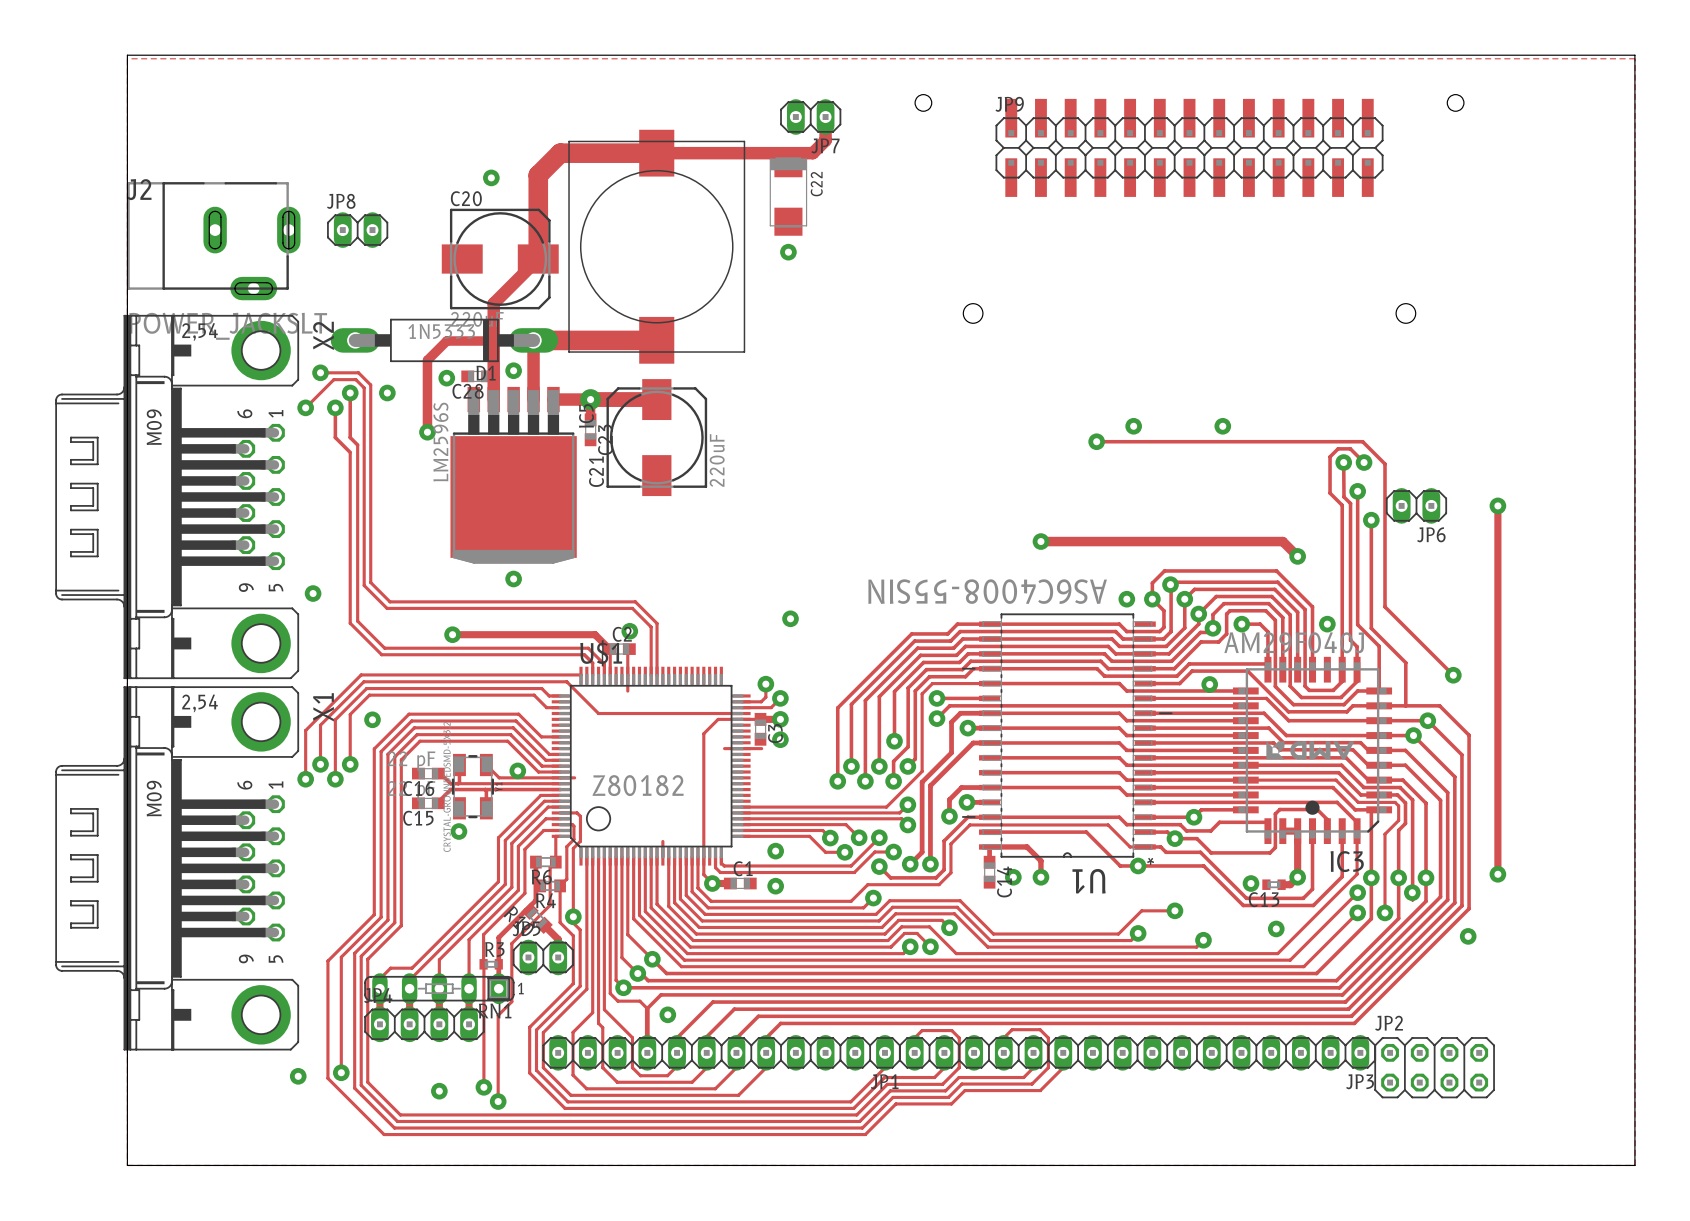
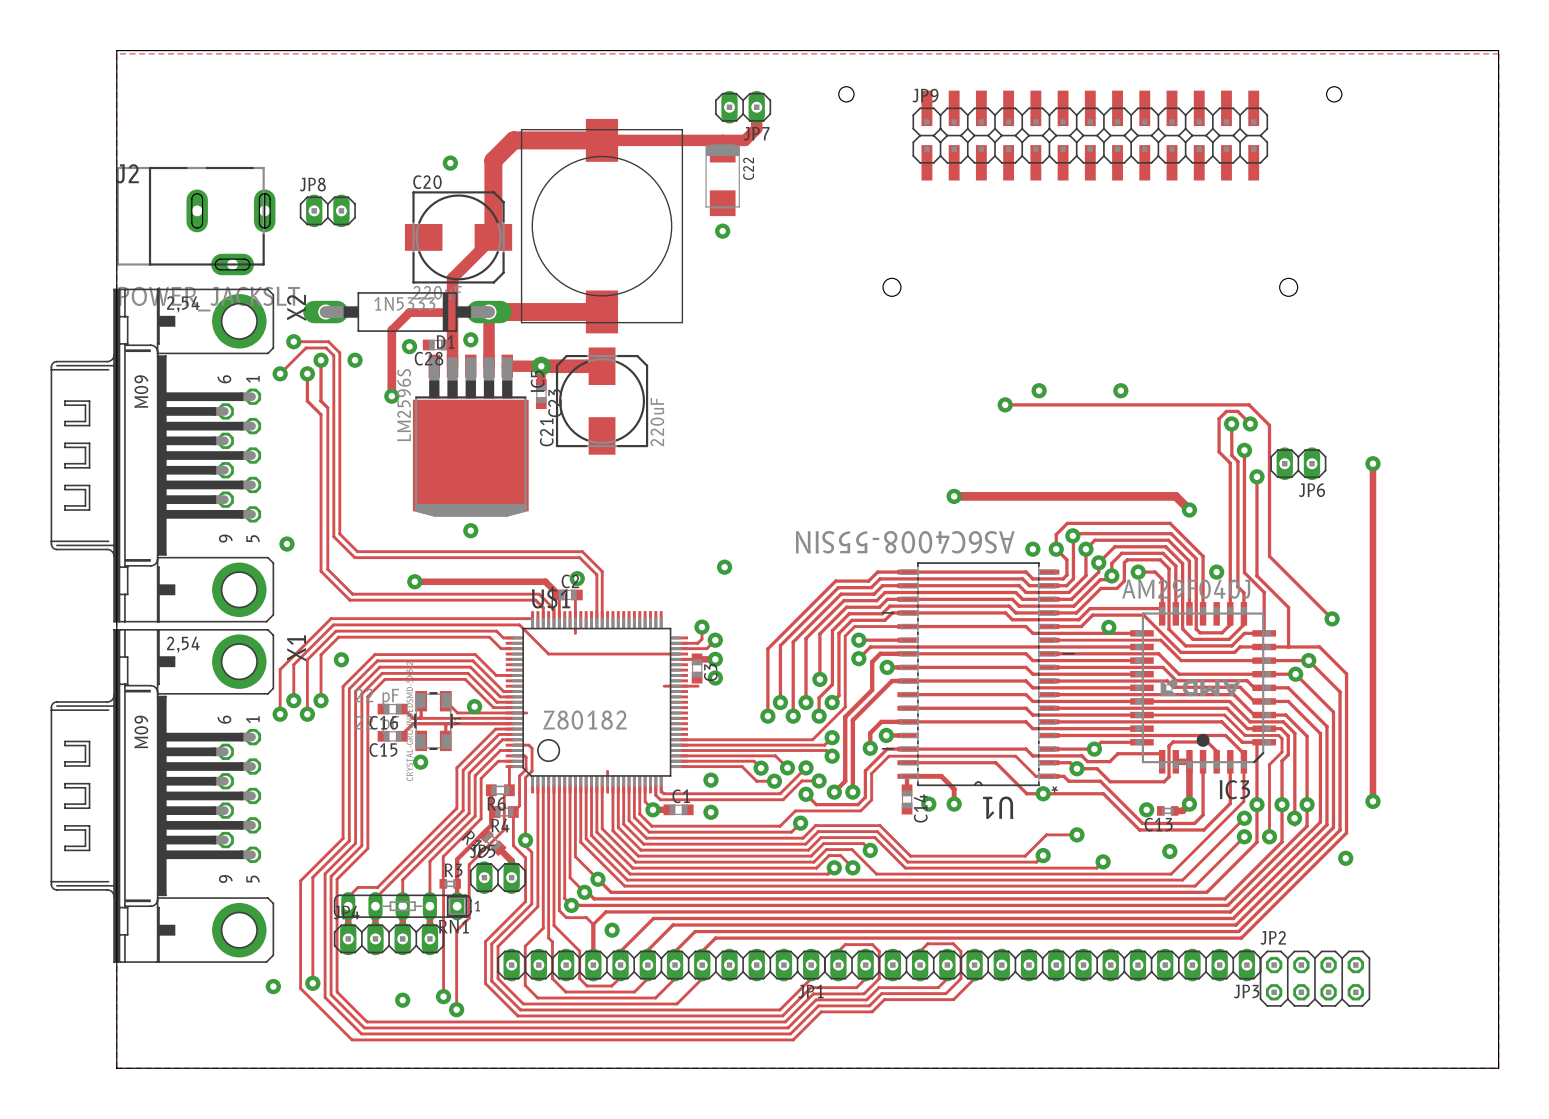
track: (741, 719) (718, 719) (703, 733) (703, 856) -> none

